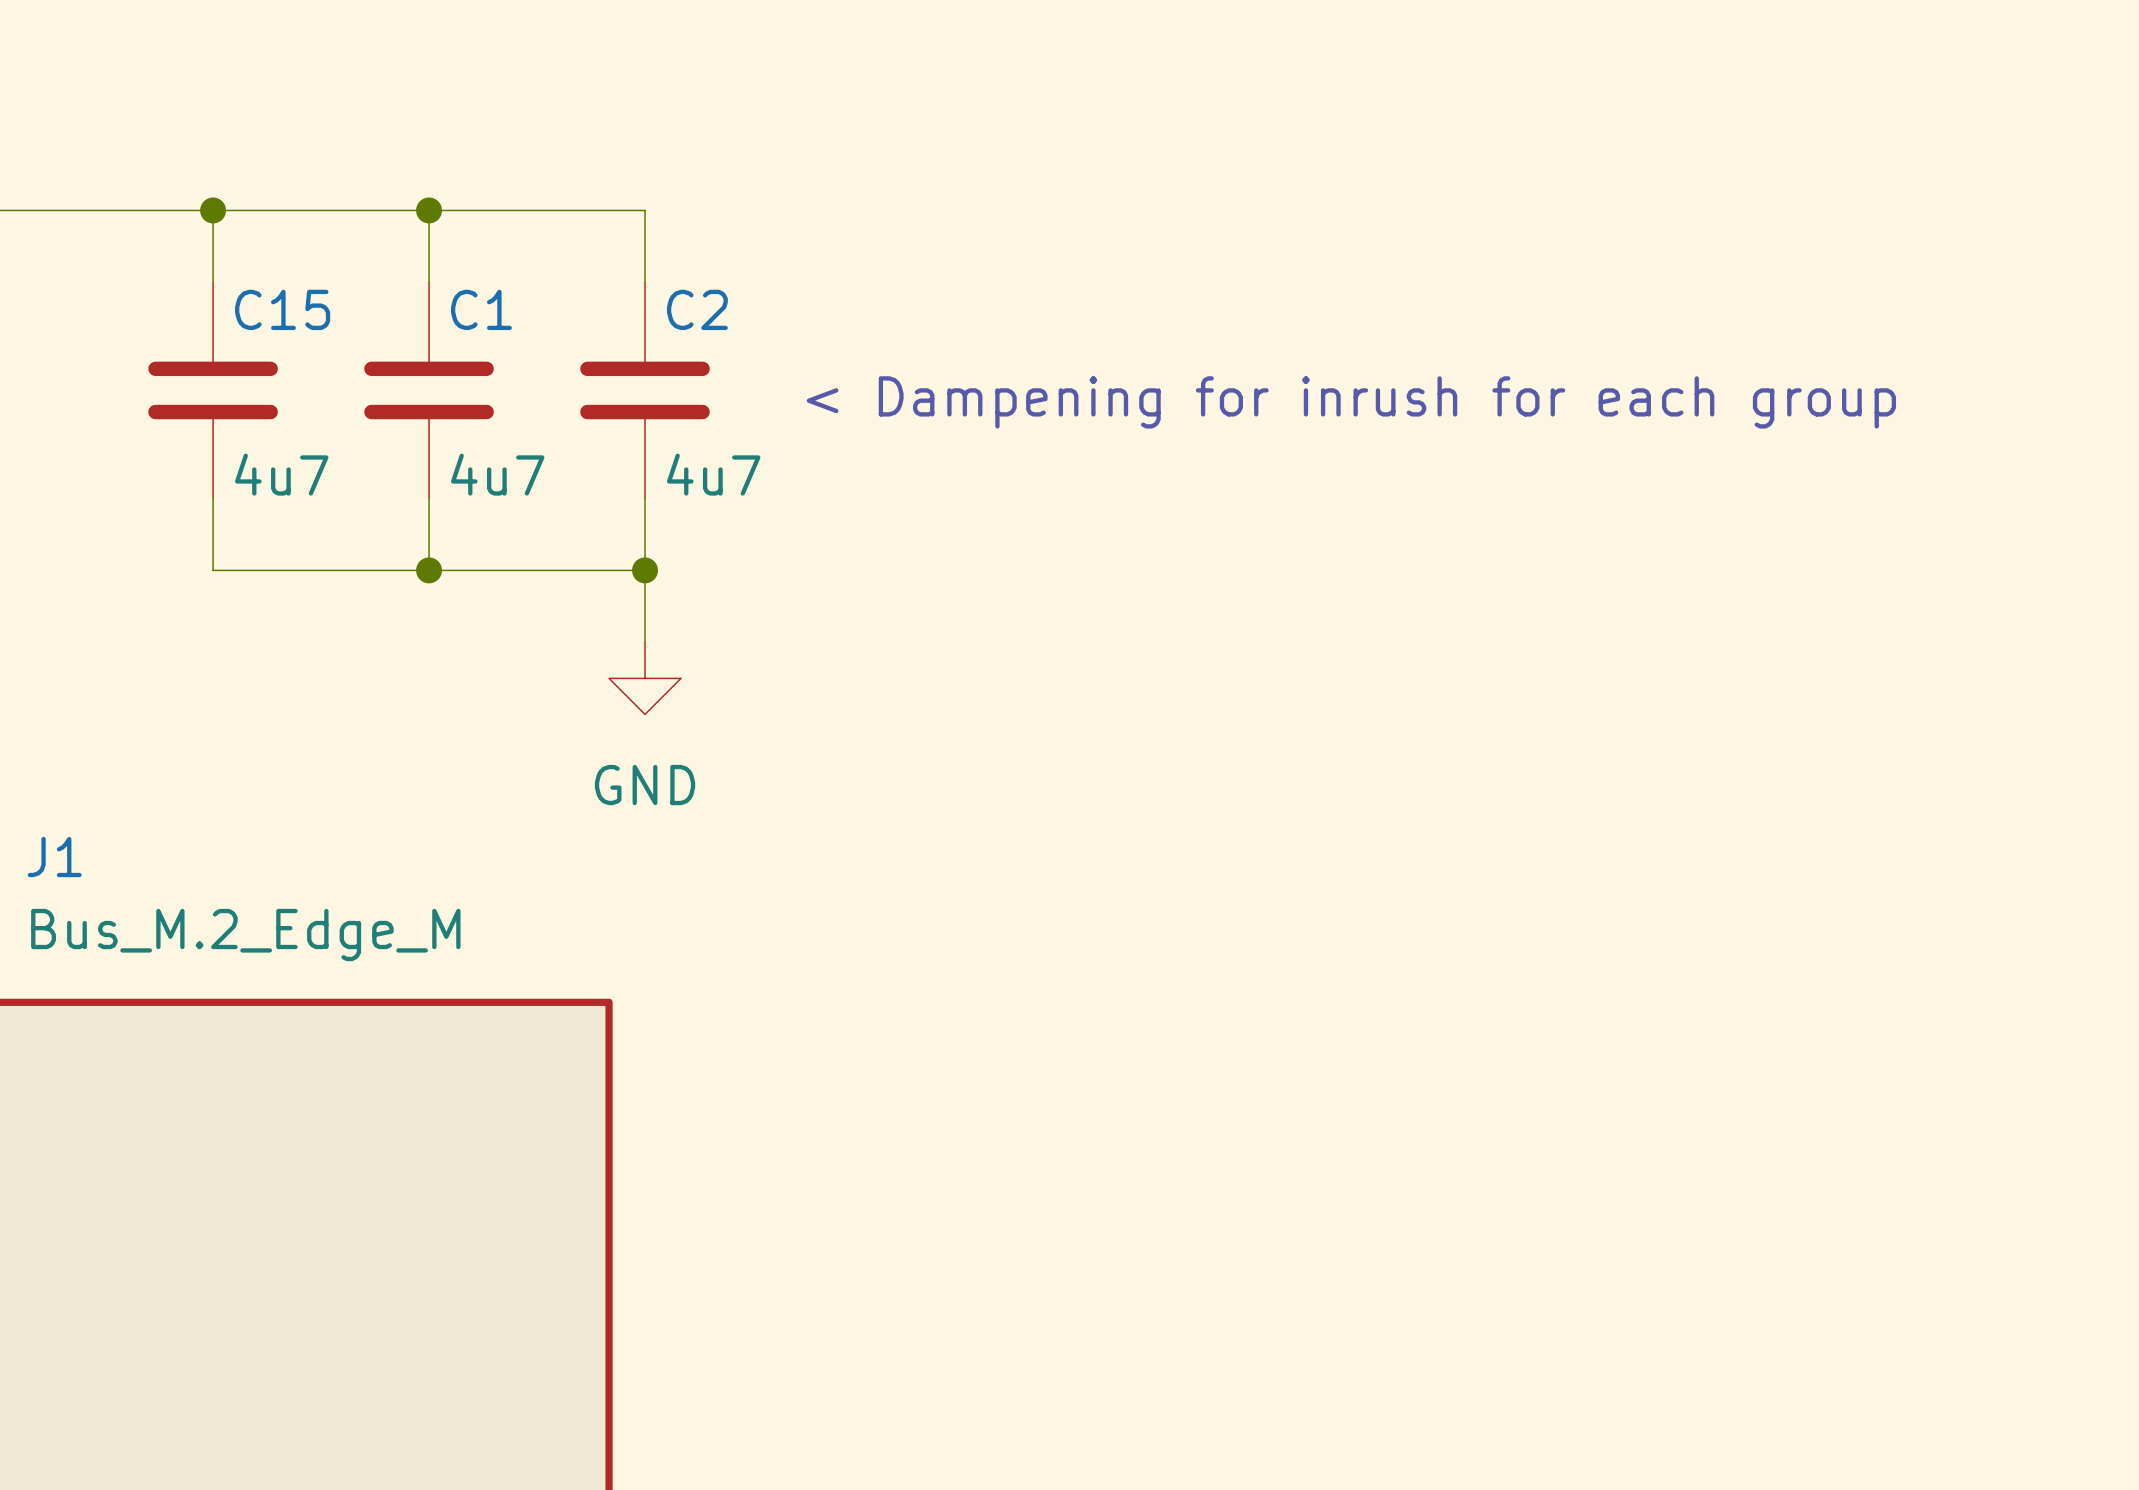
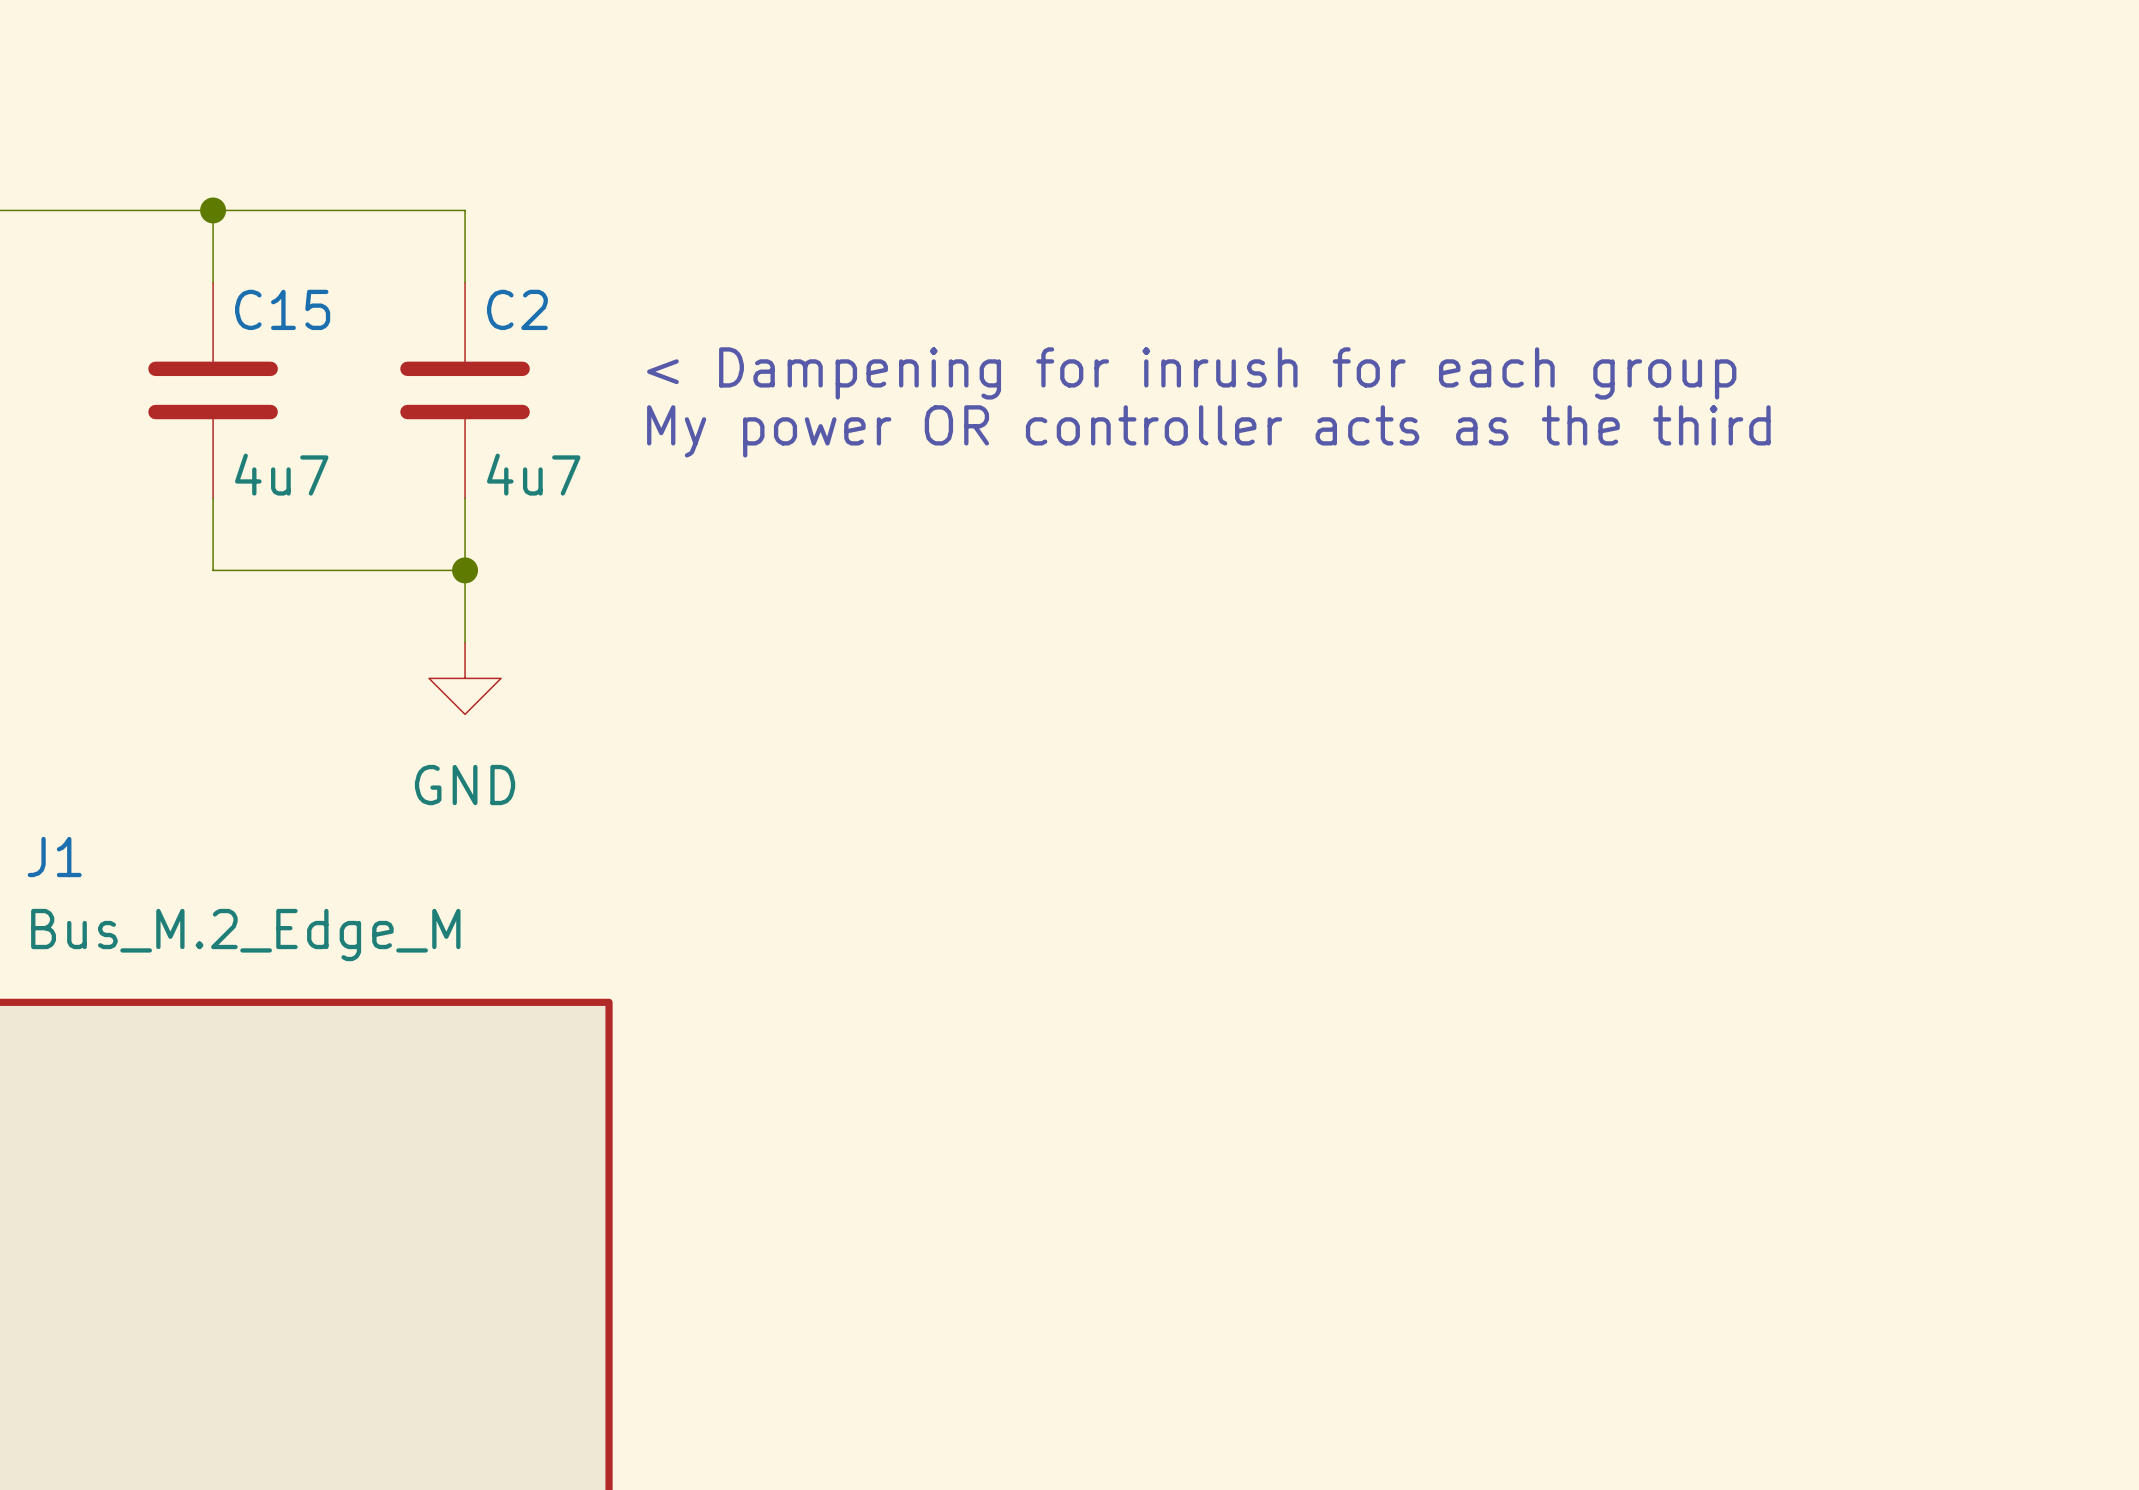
wire: (429, 210) (429, 282) -> none
junction: (429, 210) -> none
wire: (465, 210) (645, 210) (645, 282) -> (465, 210) (465, 282)
text: none -> < Dampening for inrush for each group (1191, 373)
C1: 4u7 (429, 390) -> none
C2 position: (645, 390) -> (465, 390)
text: < Dampening for inrush for each group (1351, 402) -> none
text: none -> My power OR controller acts as the third (1208, 431)
wire: (429, 498) (429, 570) -> none
wire: (645, 498) (645, 642) -> (465, 498) (465, 642)
junction position: (429, 570) -> (465, 570)
wire: (465, 570) (645, 570) -> none
junction: (645, 570) -> none
power symbol position: GND (645, 678) -> GND (465, 678)

